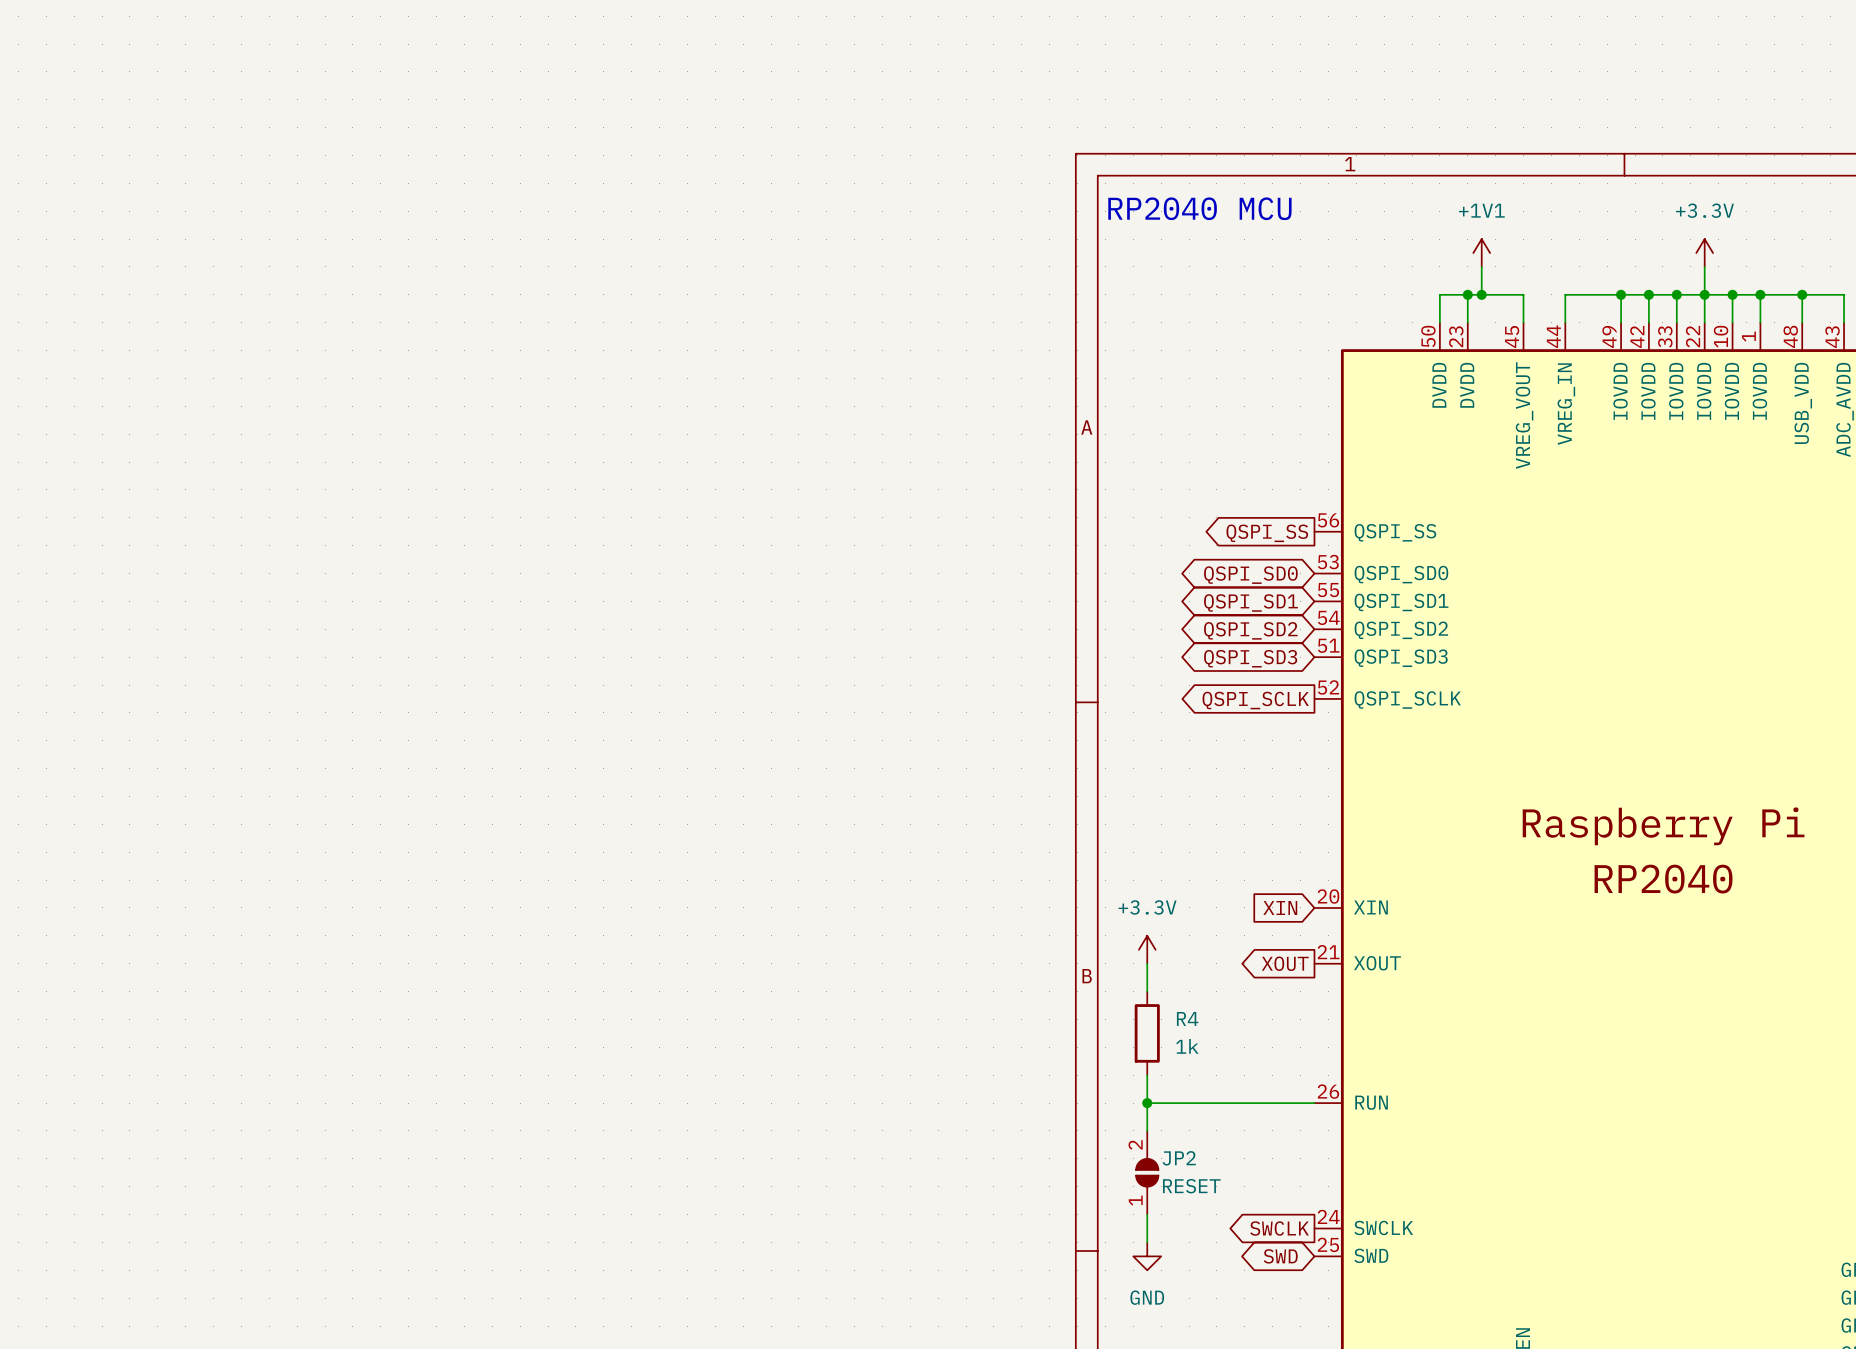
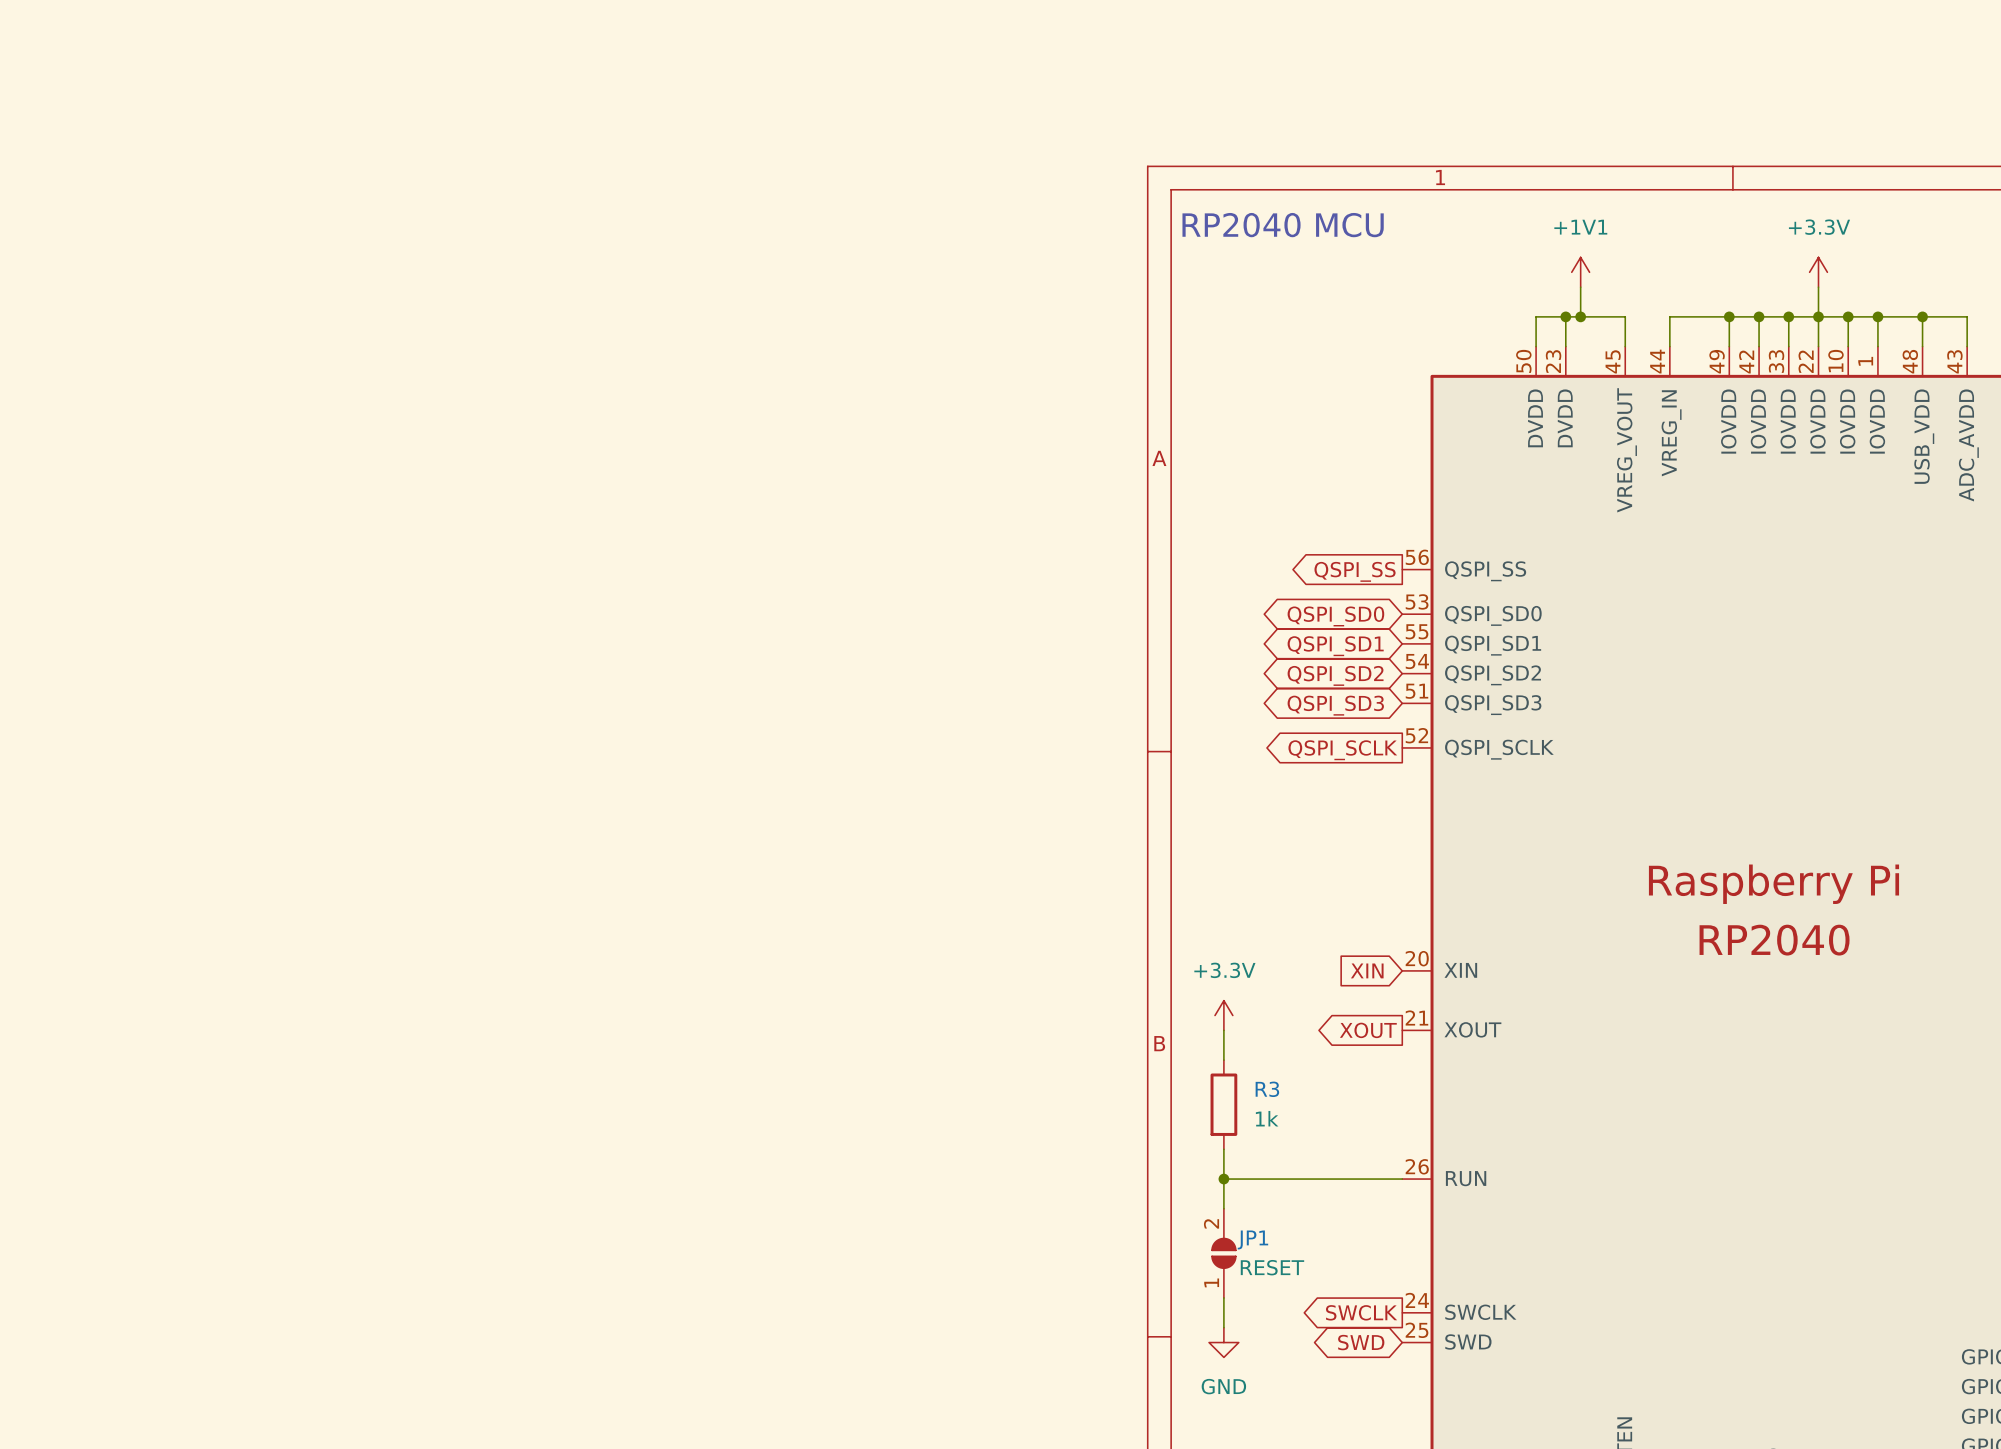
R4 name: R4 (1187, 1018) -> R3 (1267, 1089)
JP2 name: JP2 (1179, 1158) -> JP1 (1252, 1239)

